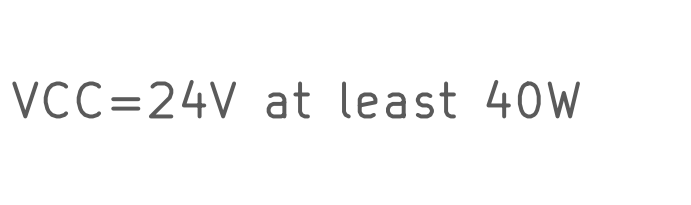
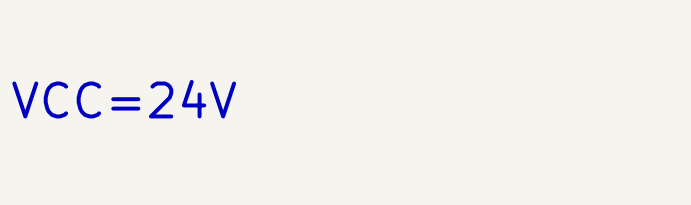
text: VCC=24V at least 40W (296, 99) -> VCC=24V (124, 99)

